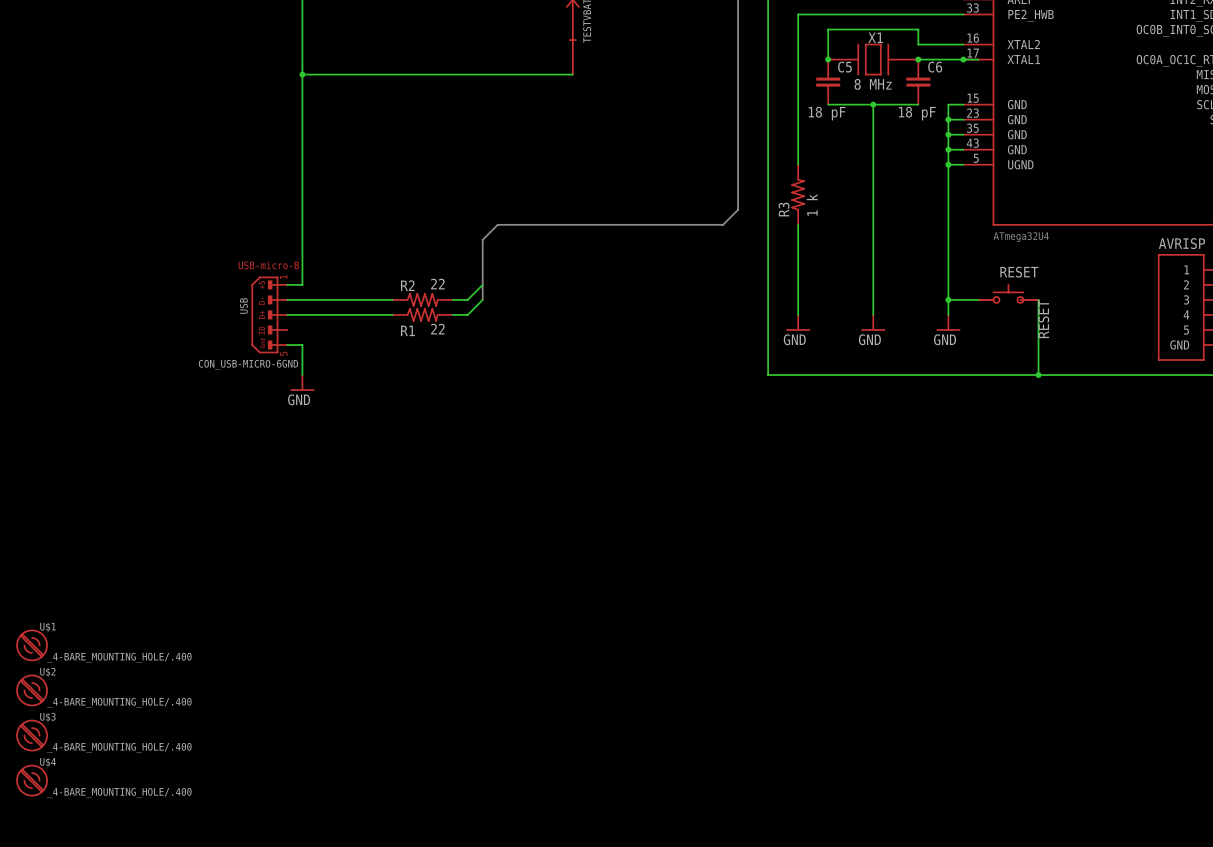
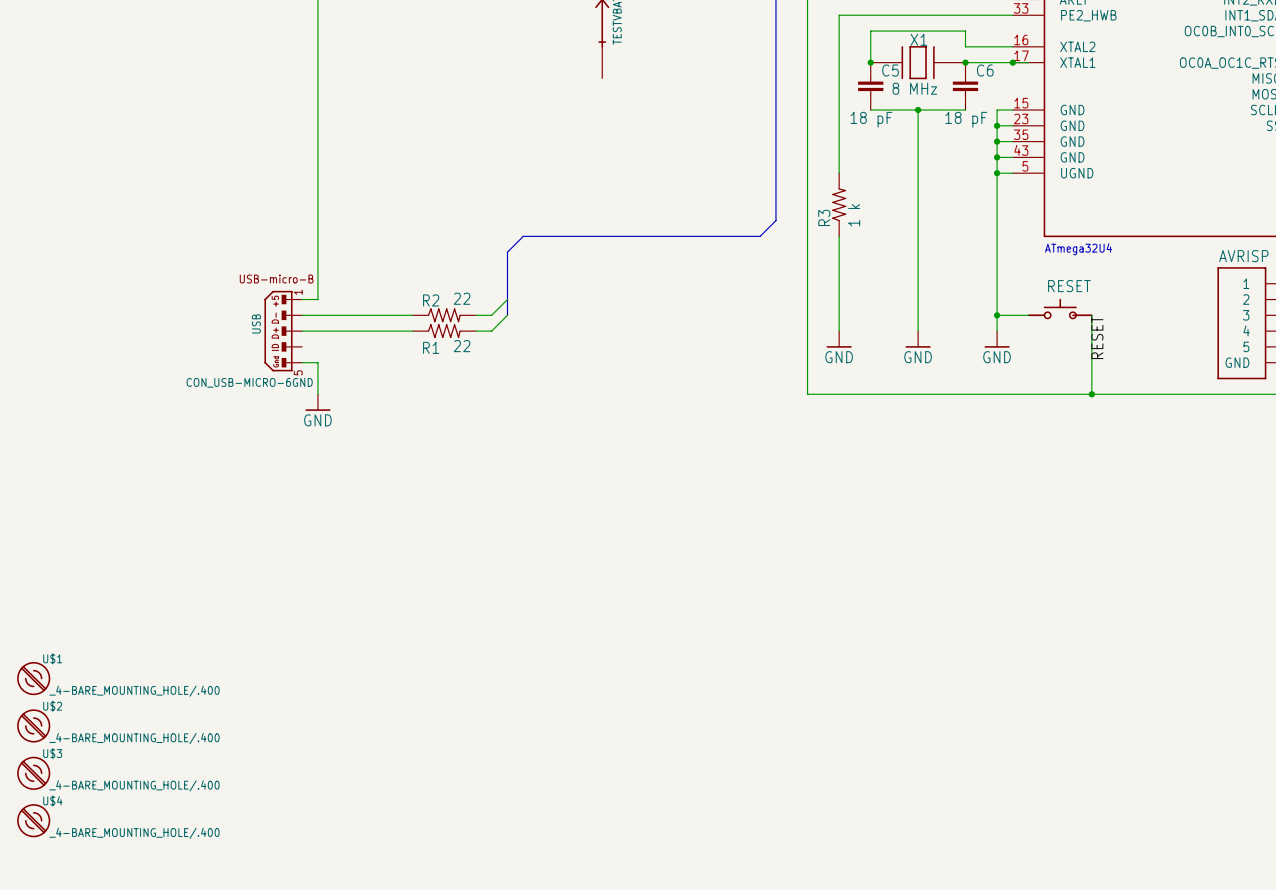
wire: (302, 74) (572, 74) -> none
junction: (302, 74) -> none

